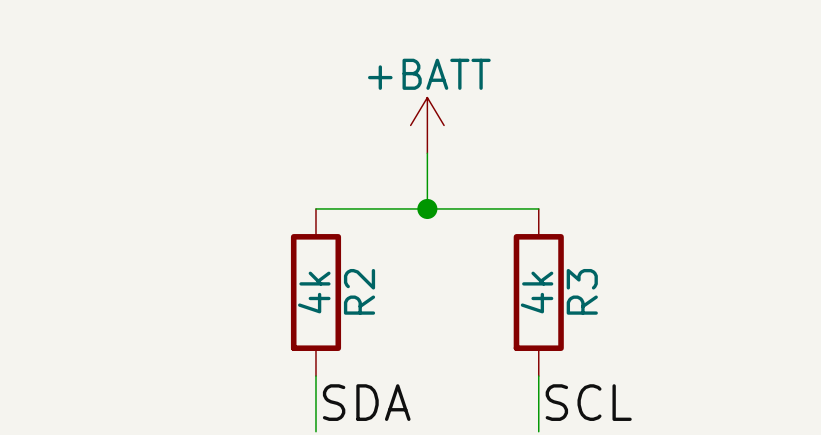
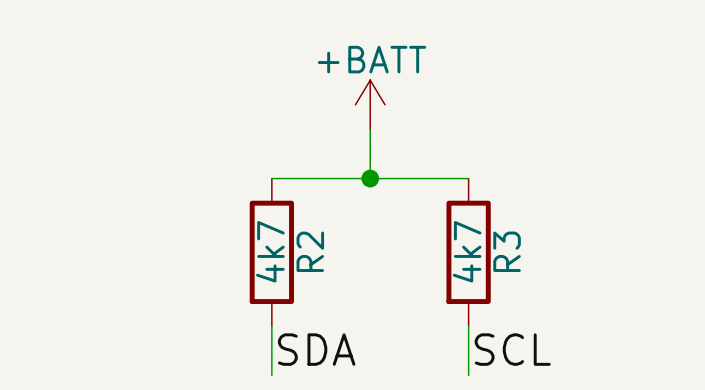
R2 value: 4k (314, 292) -> 4k7 (270, 251)
R3 value: 4k (537, 292) -> 4k7 (467, 251)

